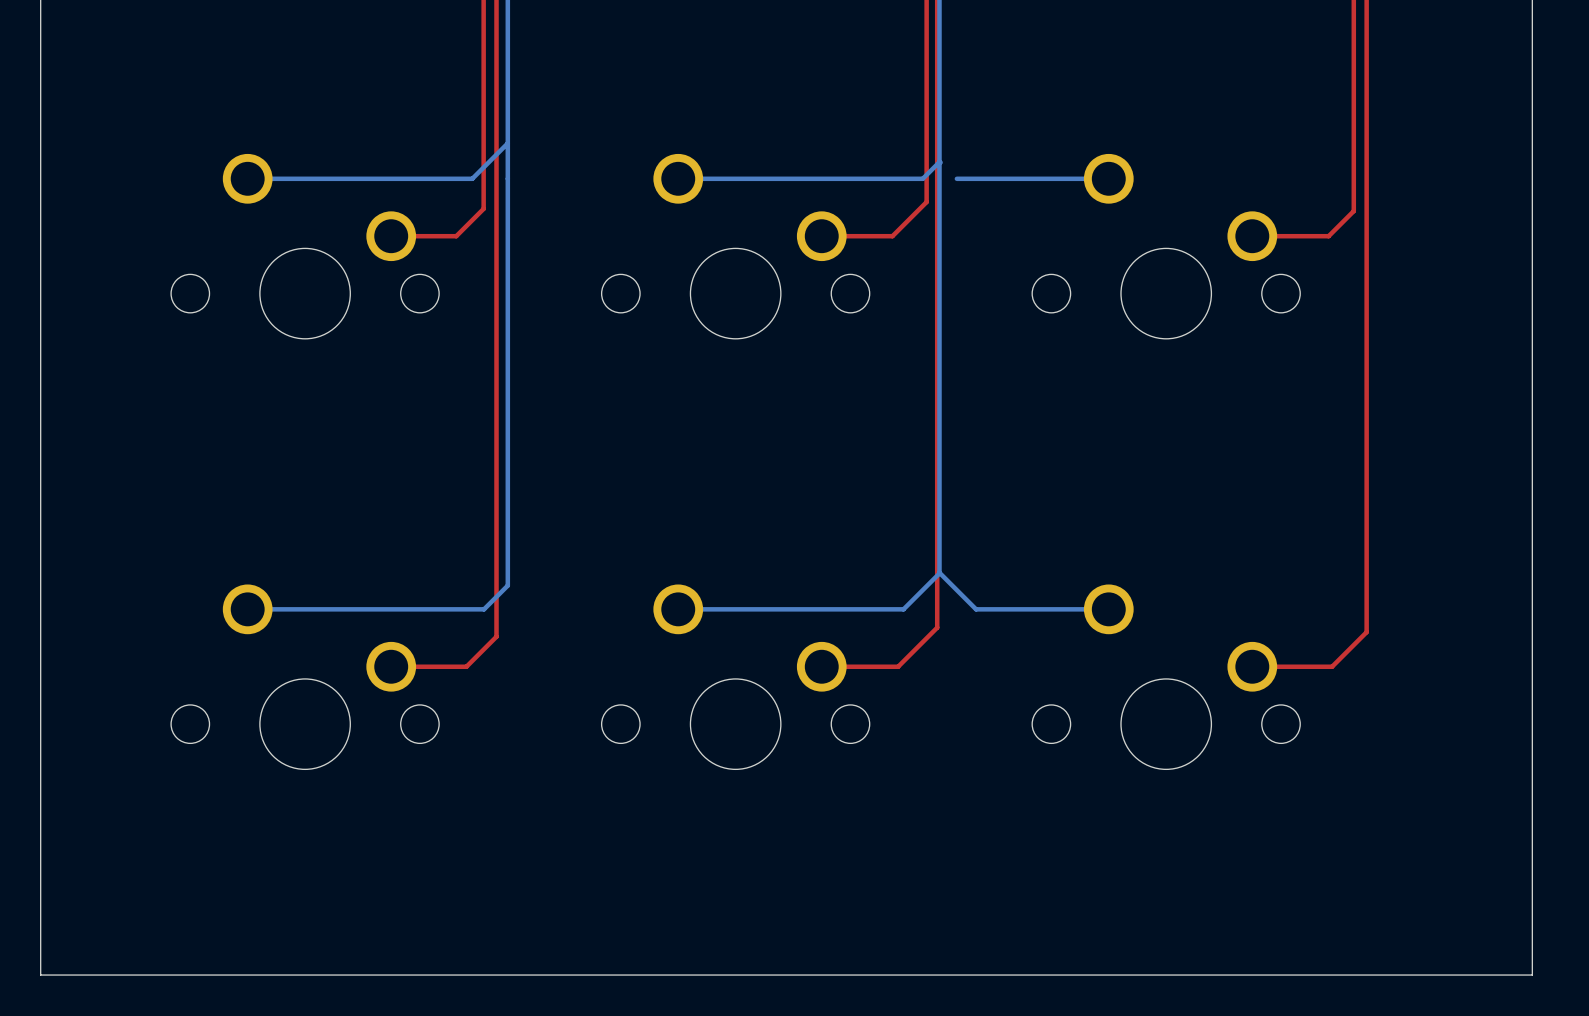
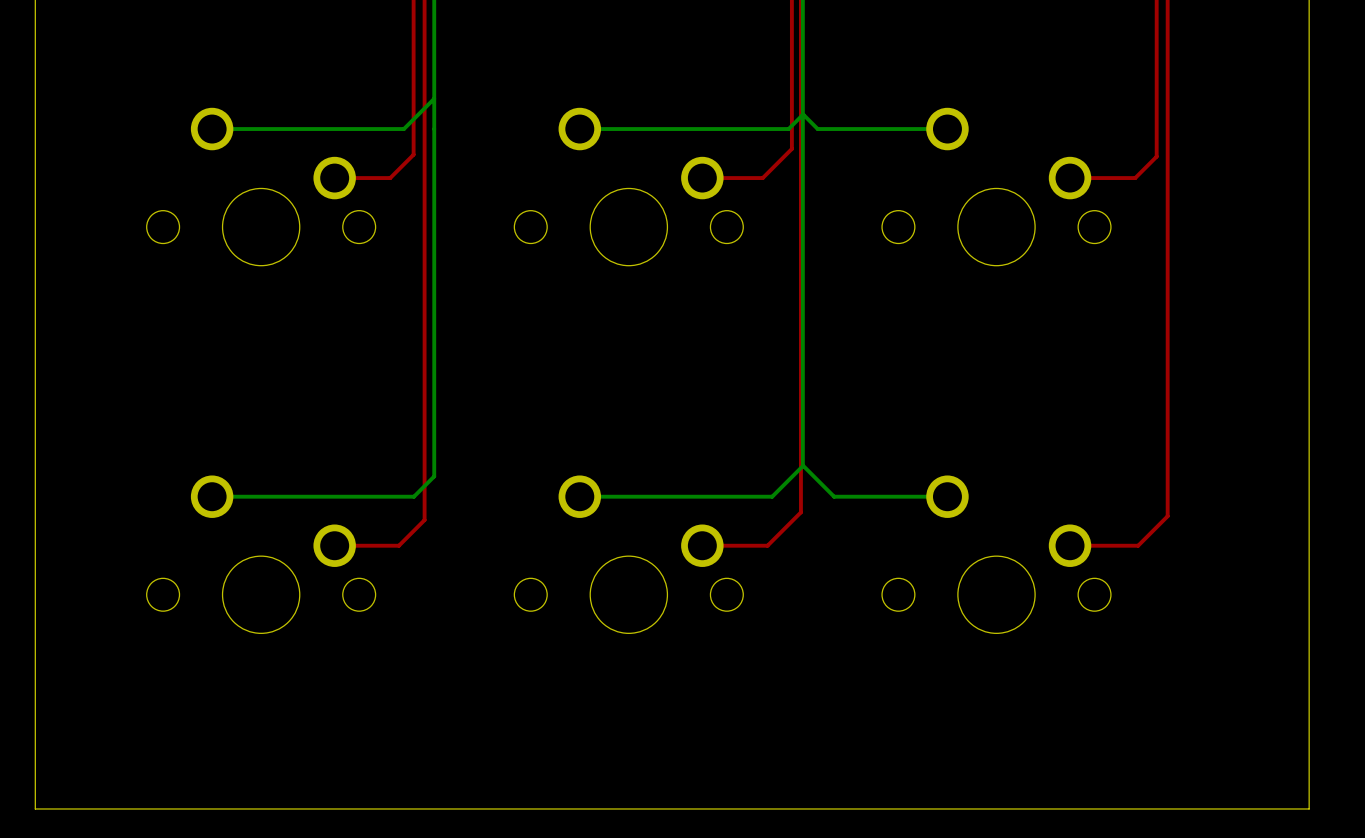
bottom track: none -> (803, 115) (817, 129)

